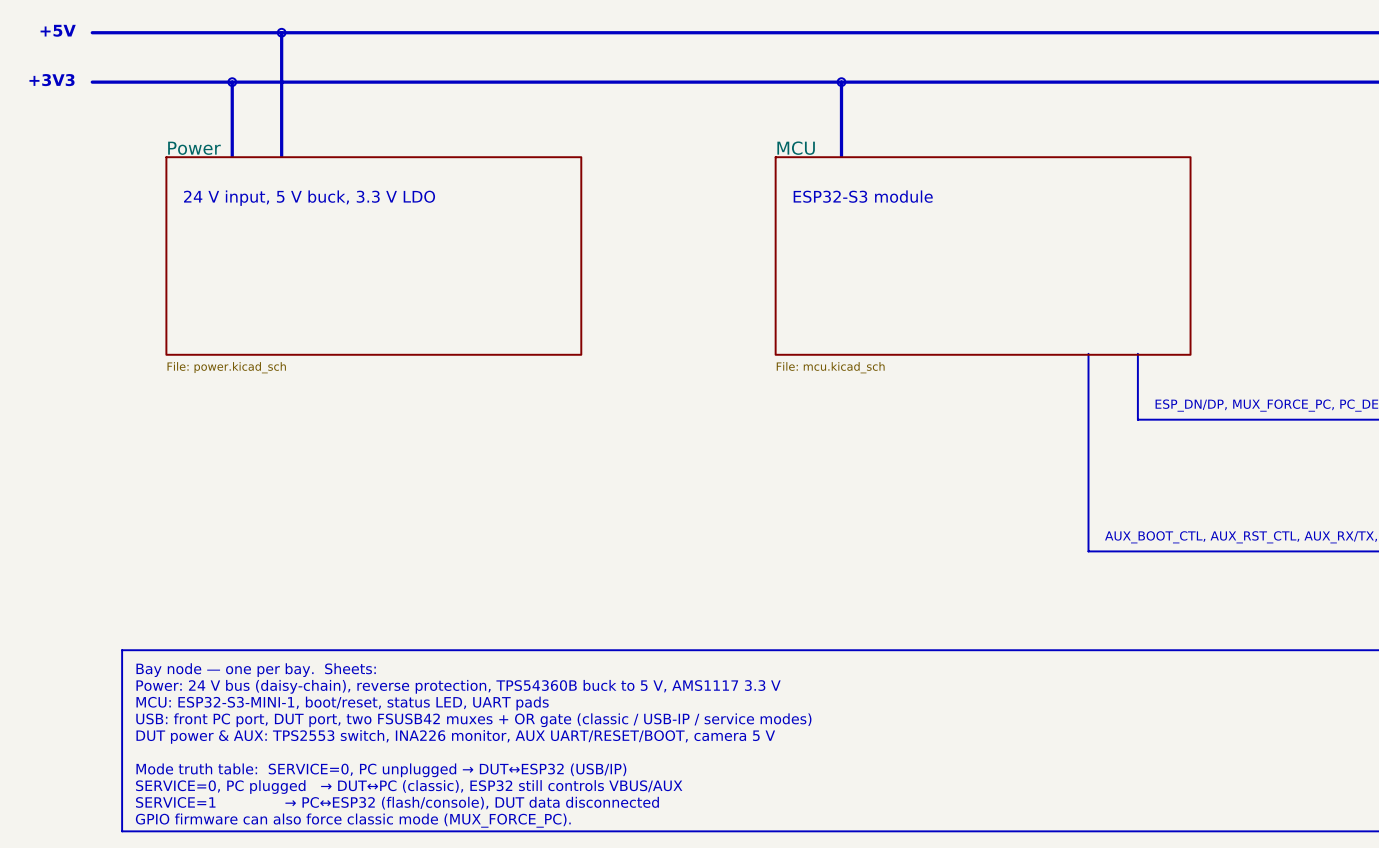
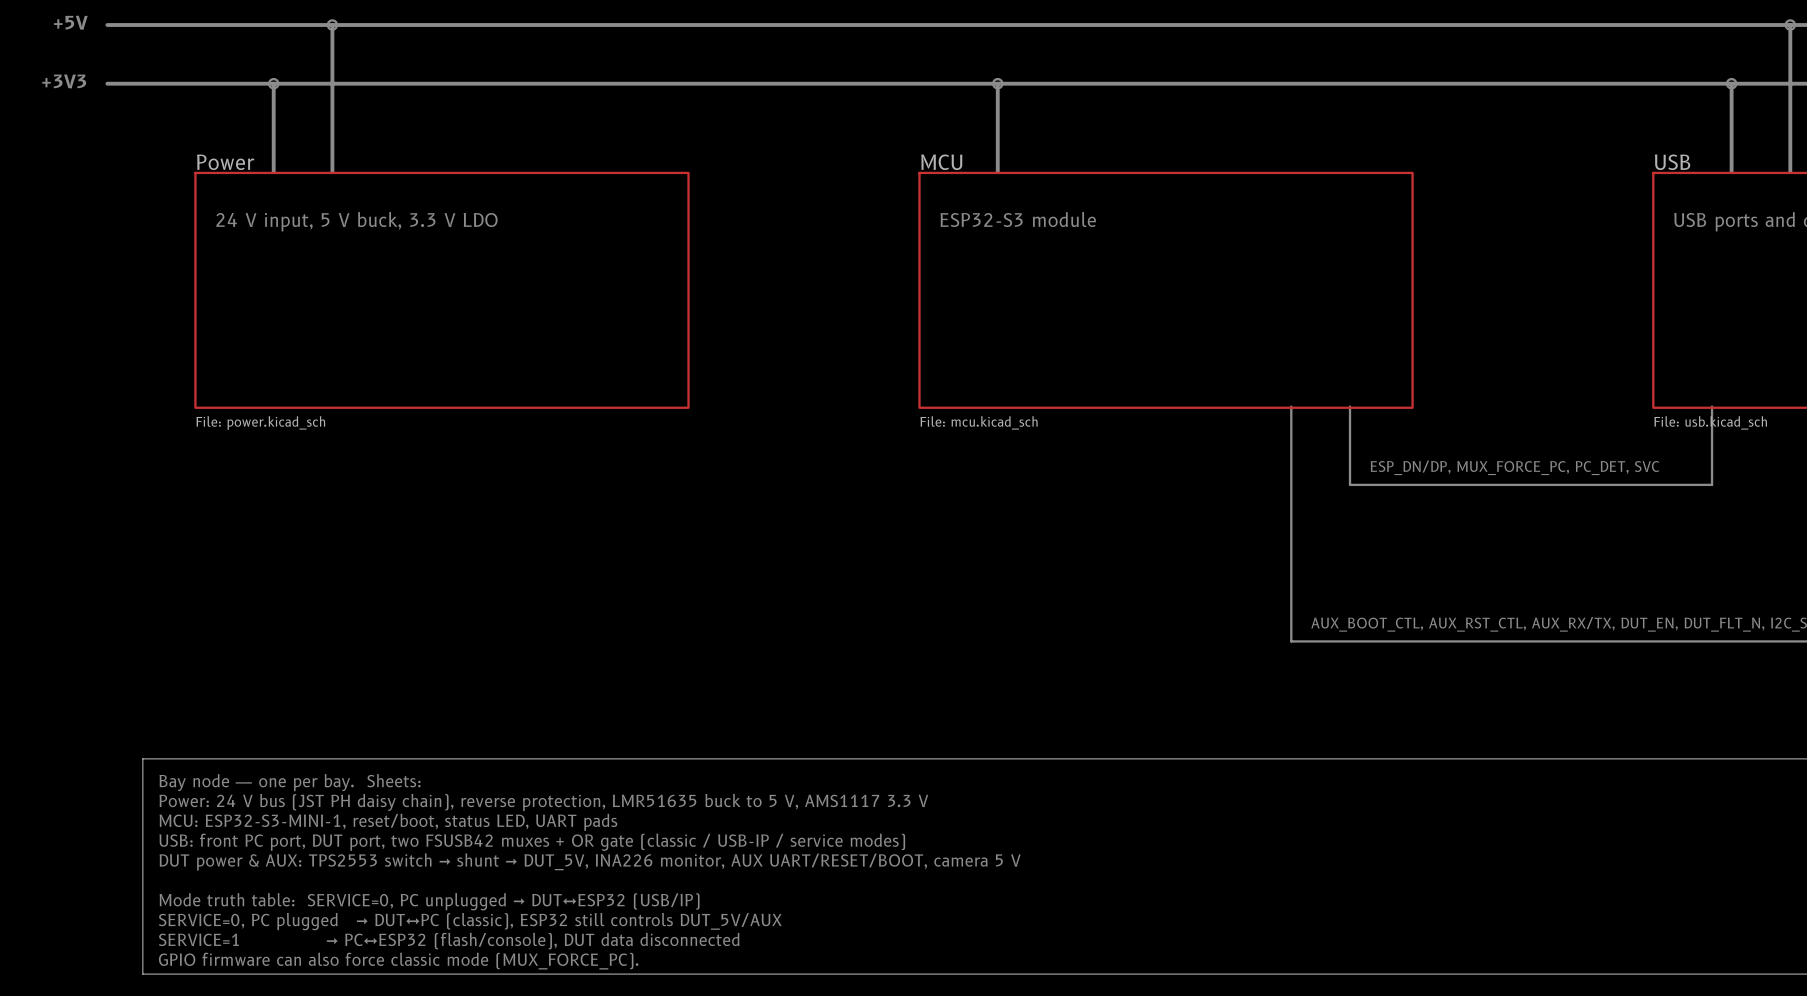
text: Power: 24 V bus (daisy-chain), reverse protection, TPS54360B buck to 5 V, AMS1117 3.3 V (458, 686) -> Power: 24 V bus (JST PH daisy chain), reverse protection, LMR51635 buck to 5 V, AMS1117 3.3 V (543, 802)
text: MCU: ESP32-S3-MINI-1, boot/reset, status LED, UART pads (342, 703) -> MCU: ESP32-S3-MINI-1, reset/boot, status LED, UART pads (388, 822)
text: DUT power & AUX: TPS2553 switch, INA226 monitor, AUX UART/RESET/BOOT, camera 5 V (455, 736) -> DUT power & AUX: TPS2553 switch → shunt → DUT_5V, INA226 monitor, AUX UART/RESET/BOOT, camera 5 V (590, 862)
text: SERVICE=0, PC plugged → DUT↔PC (classic), ESP32 still controls VBUS/AUX (409, 787) -> SERVICE=0, PC plugged → DUT↔PC (classic), ESP32 still controls DUT_5V/AUX (470, 921)

